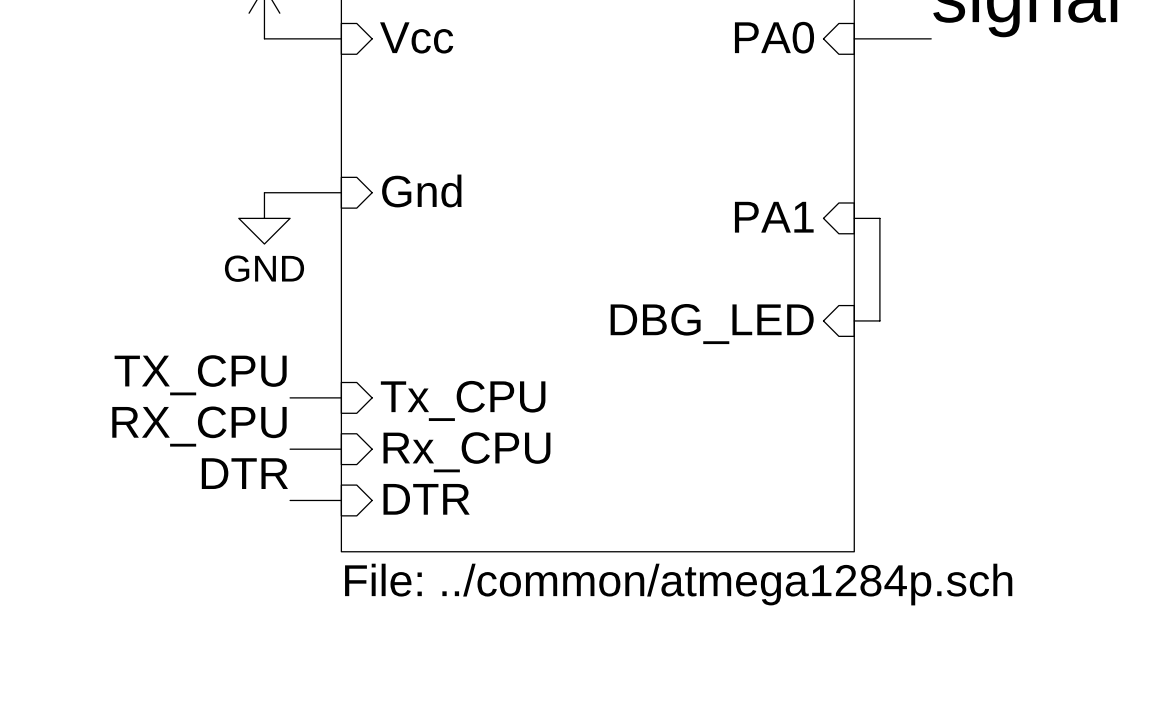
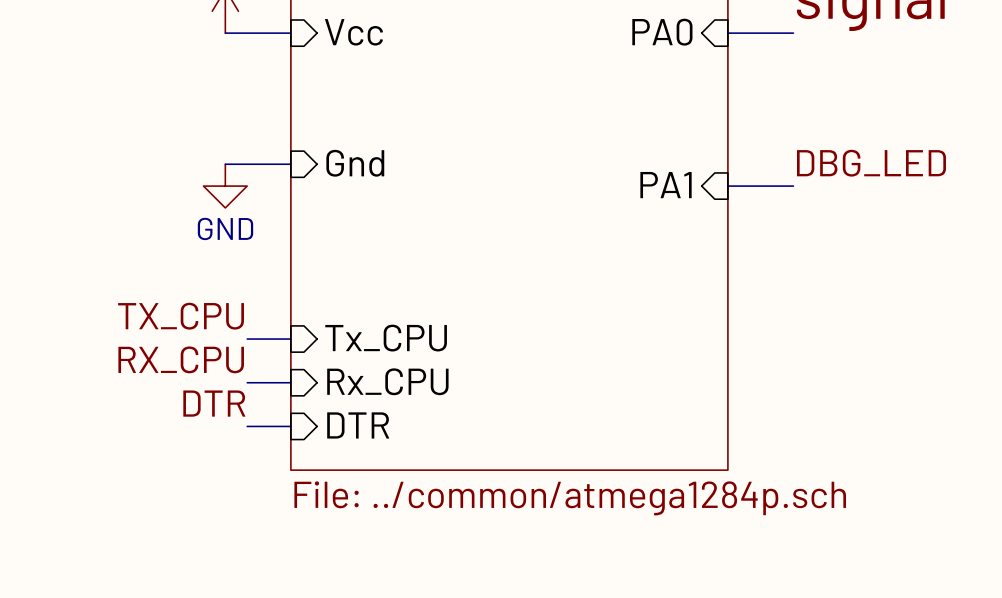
label: none -> DBG_LED (871, 163)
wire: (879, 218) (879, 320) (854, 320) -> (749, 186) (793, 186)
sheet pin: DBG_LED (712, 324) -> none

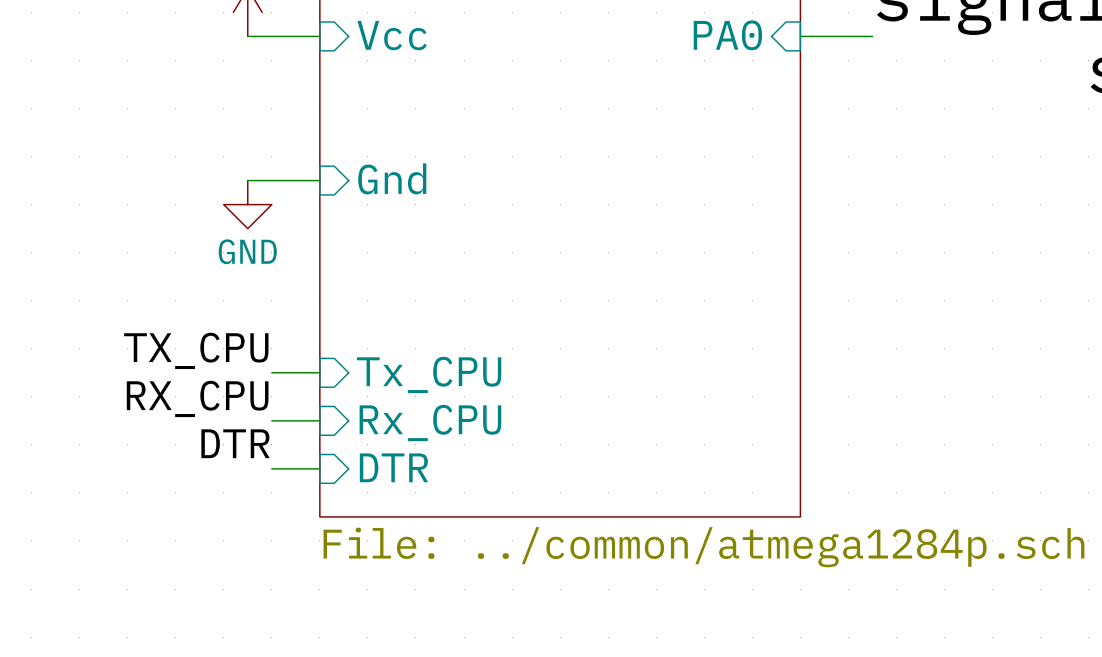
label: DBG_LED (871, 163) -> none
sheet pin: PA1 (666, 185) -> none
wire: (727, 186) (793, 186) -> none

